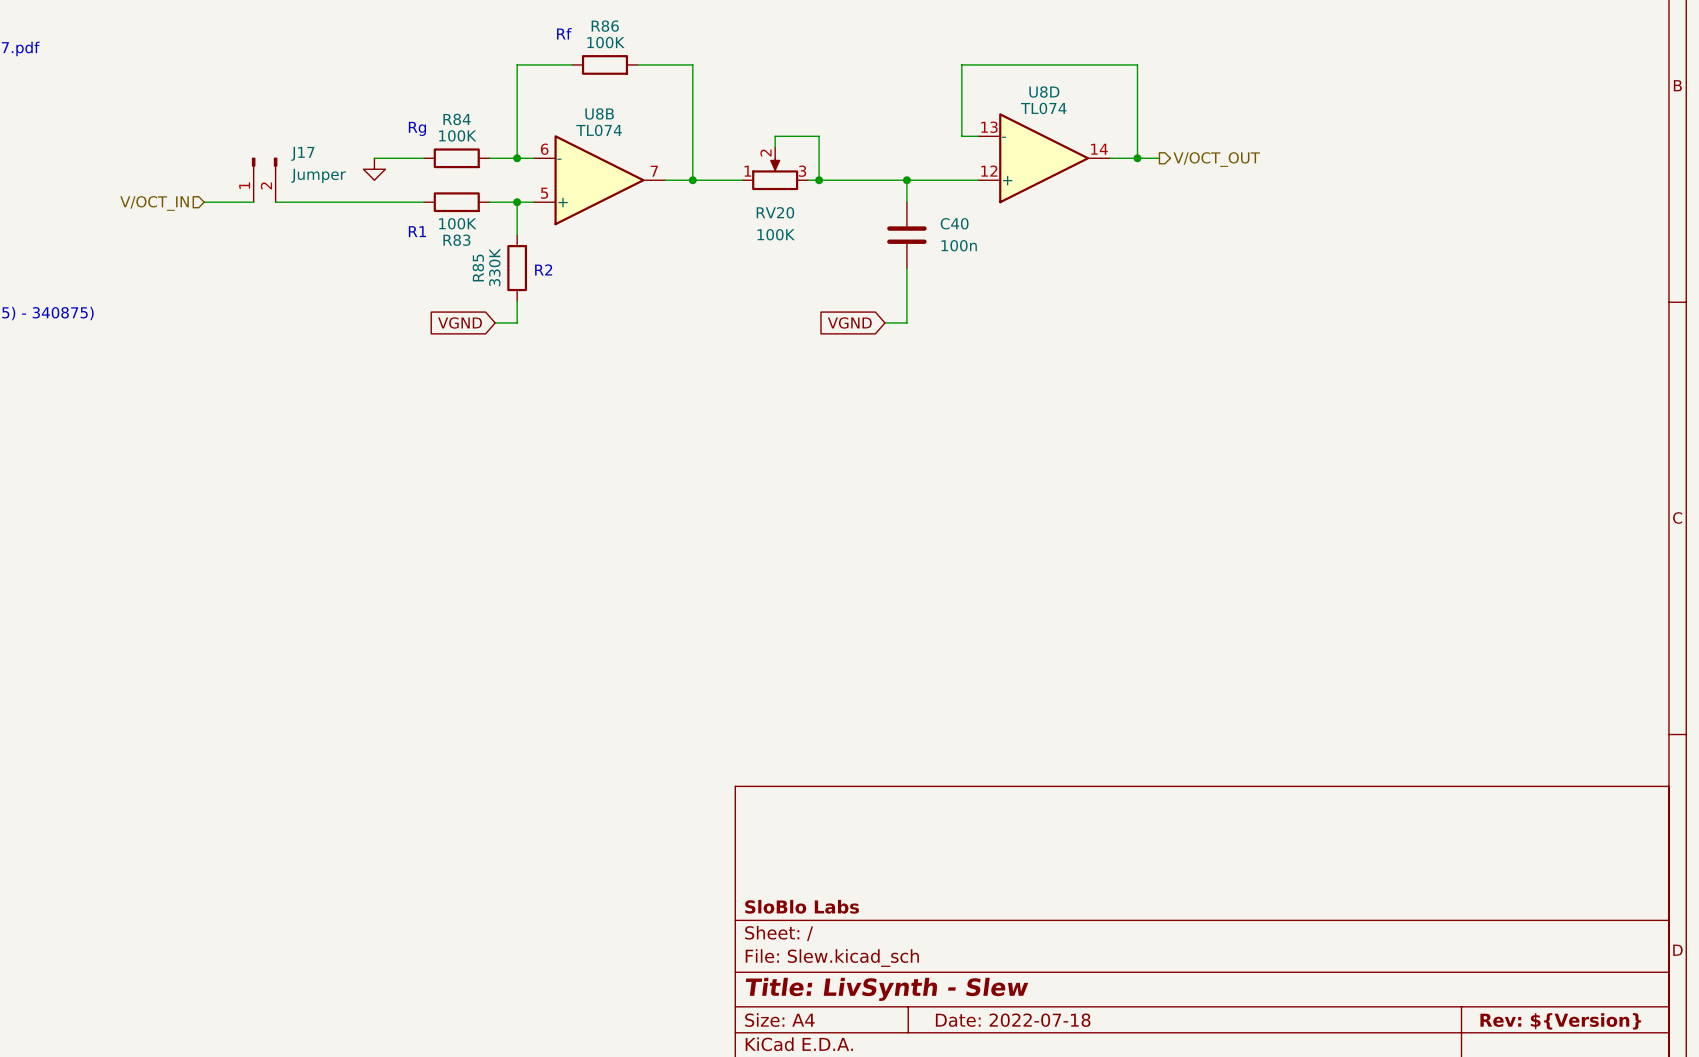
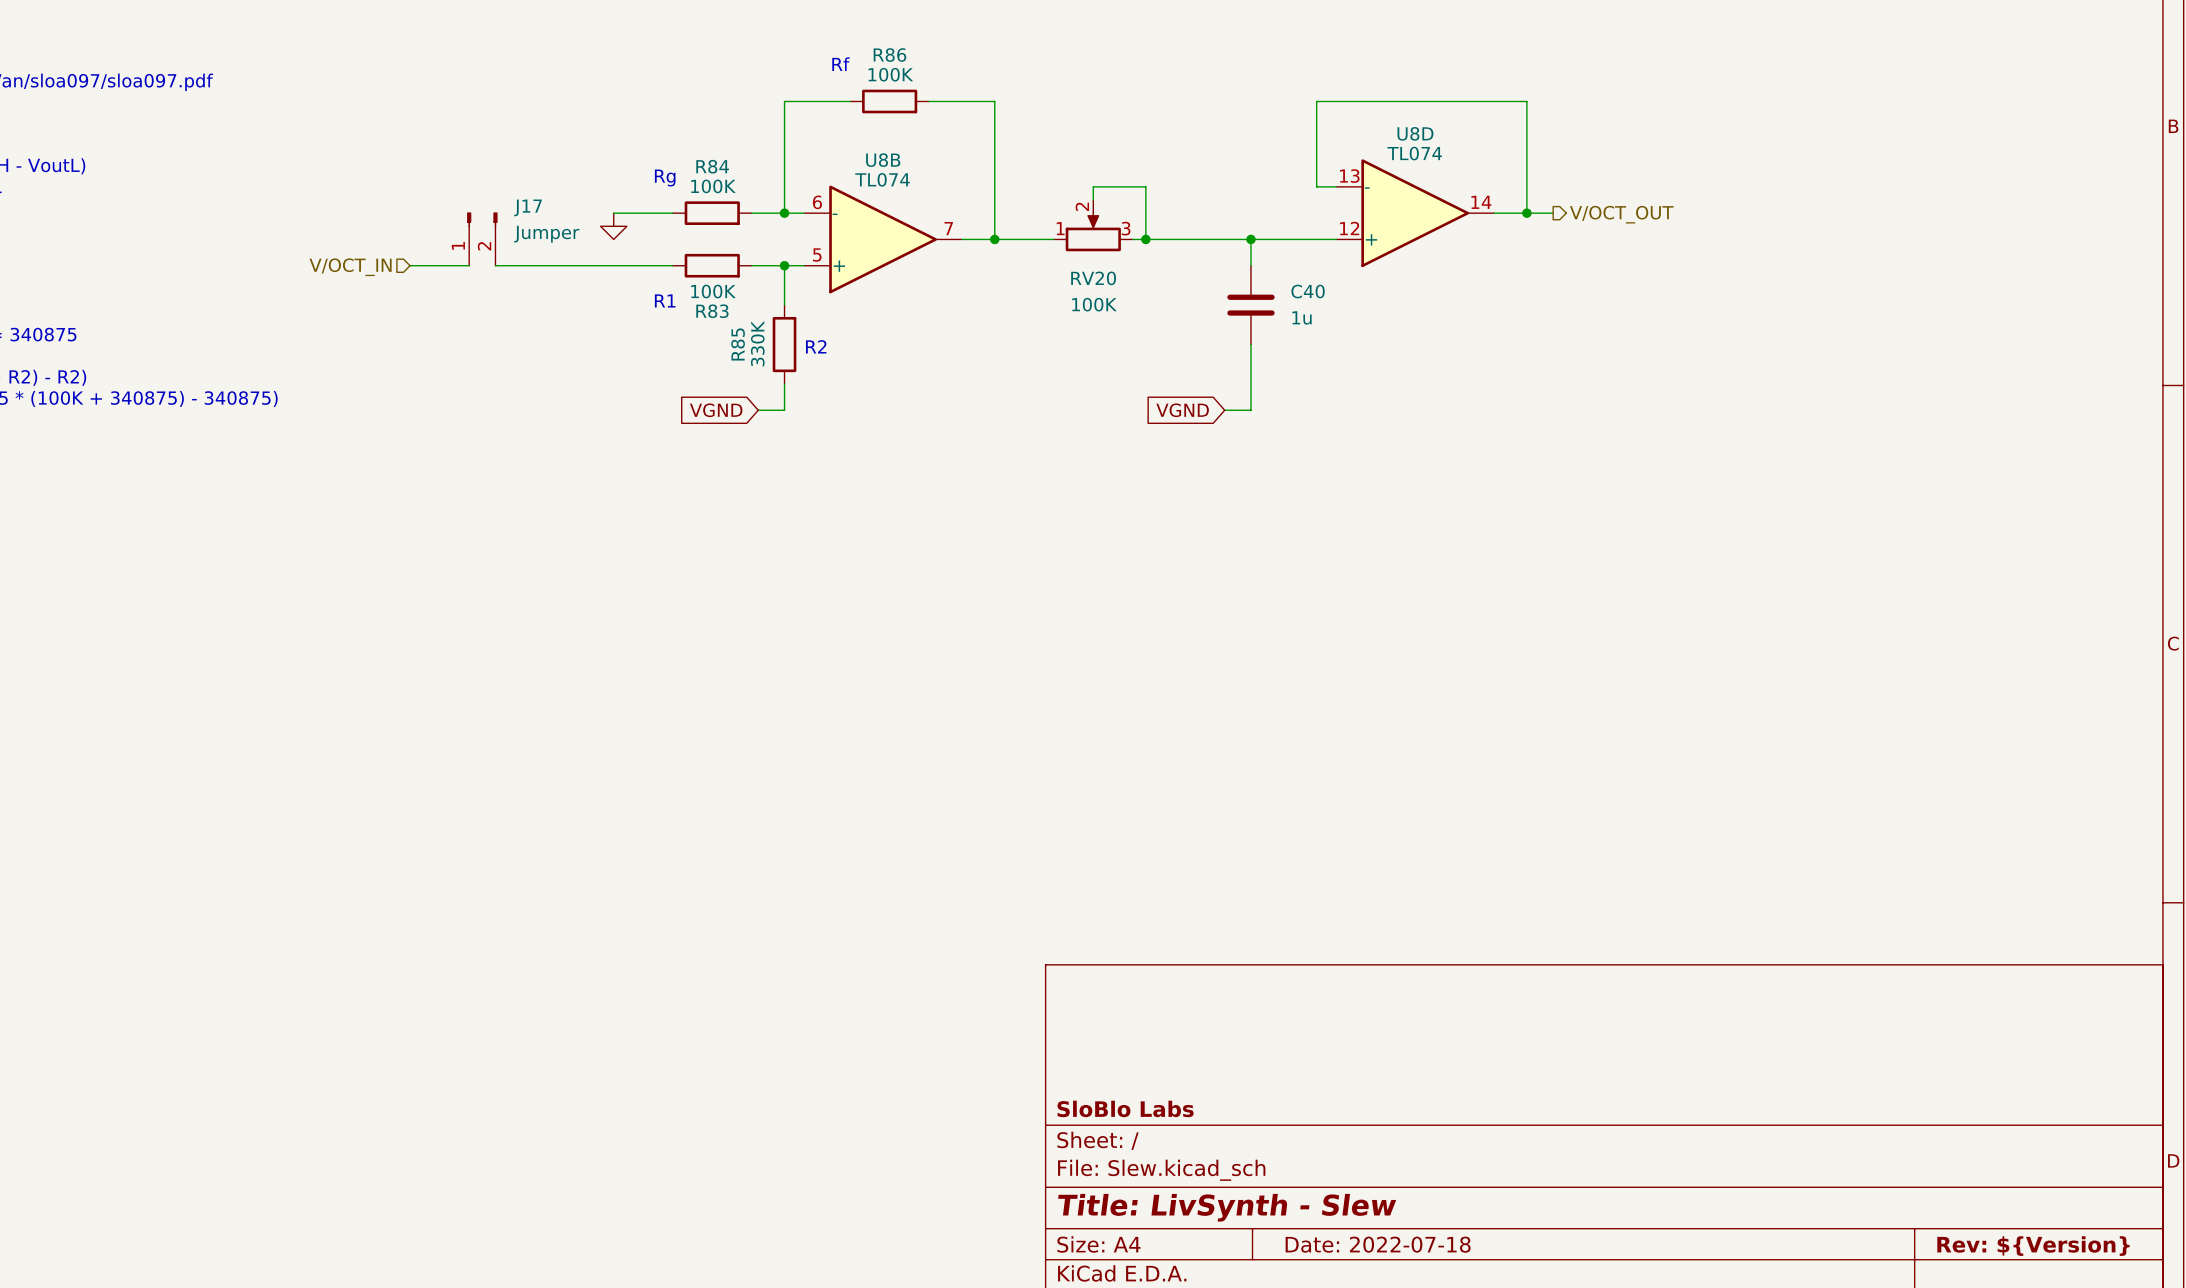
C40 value: 100n (959, 245) -> 1u (1302, 317)

